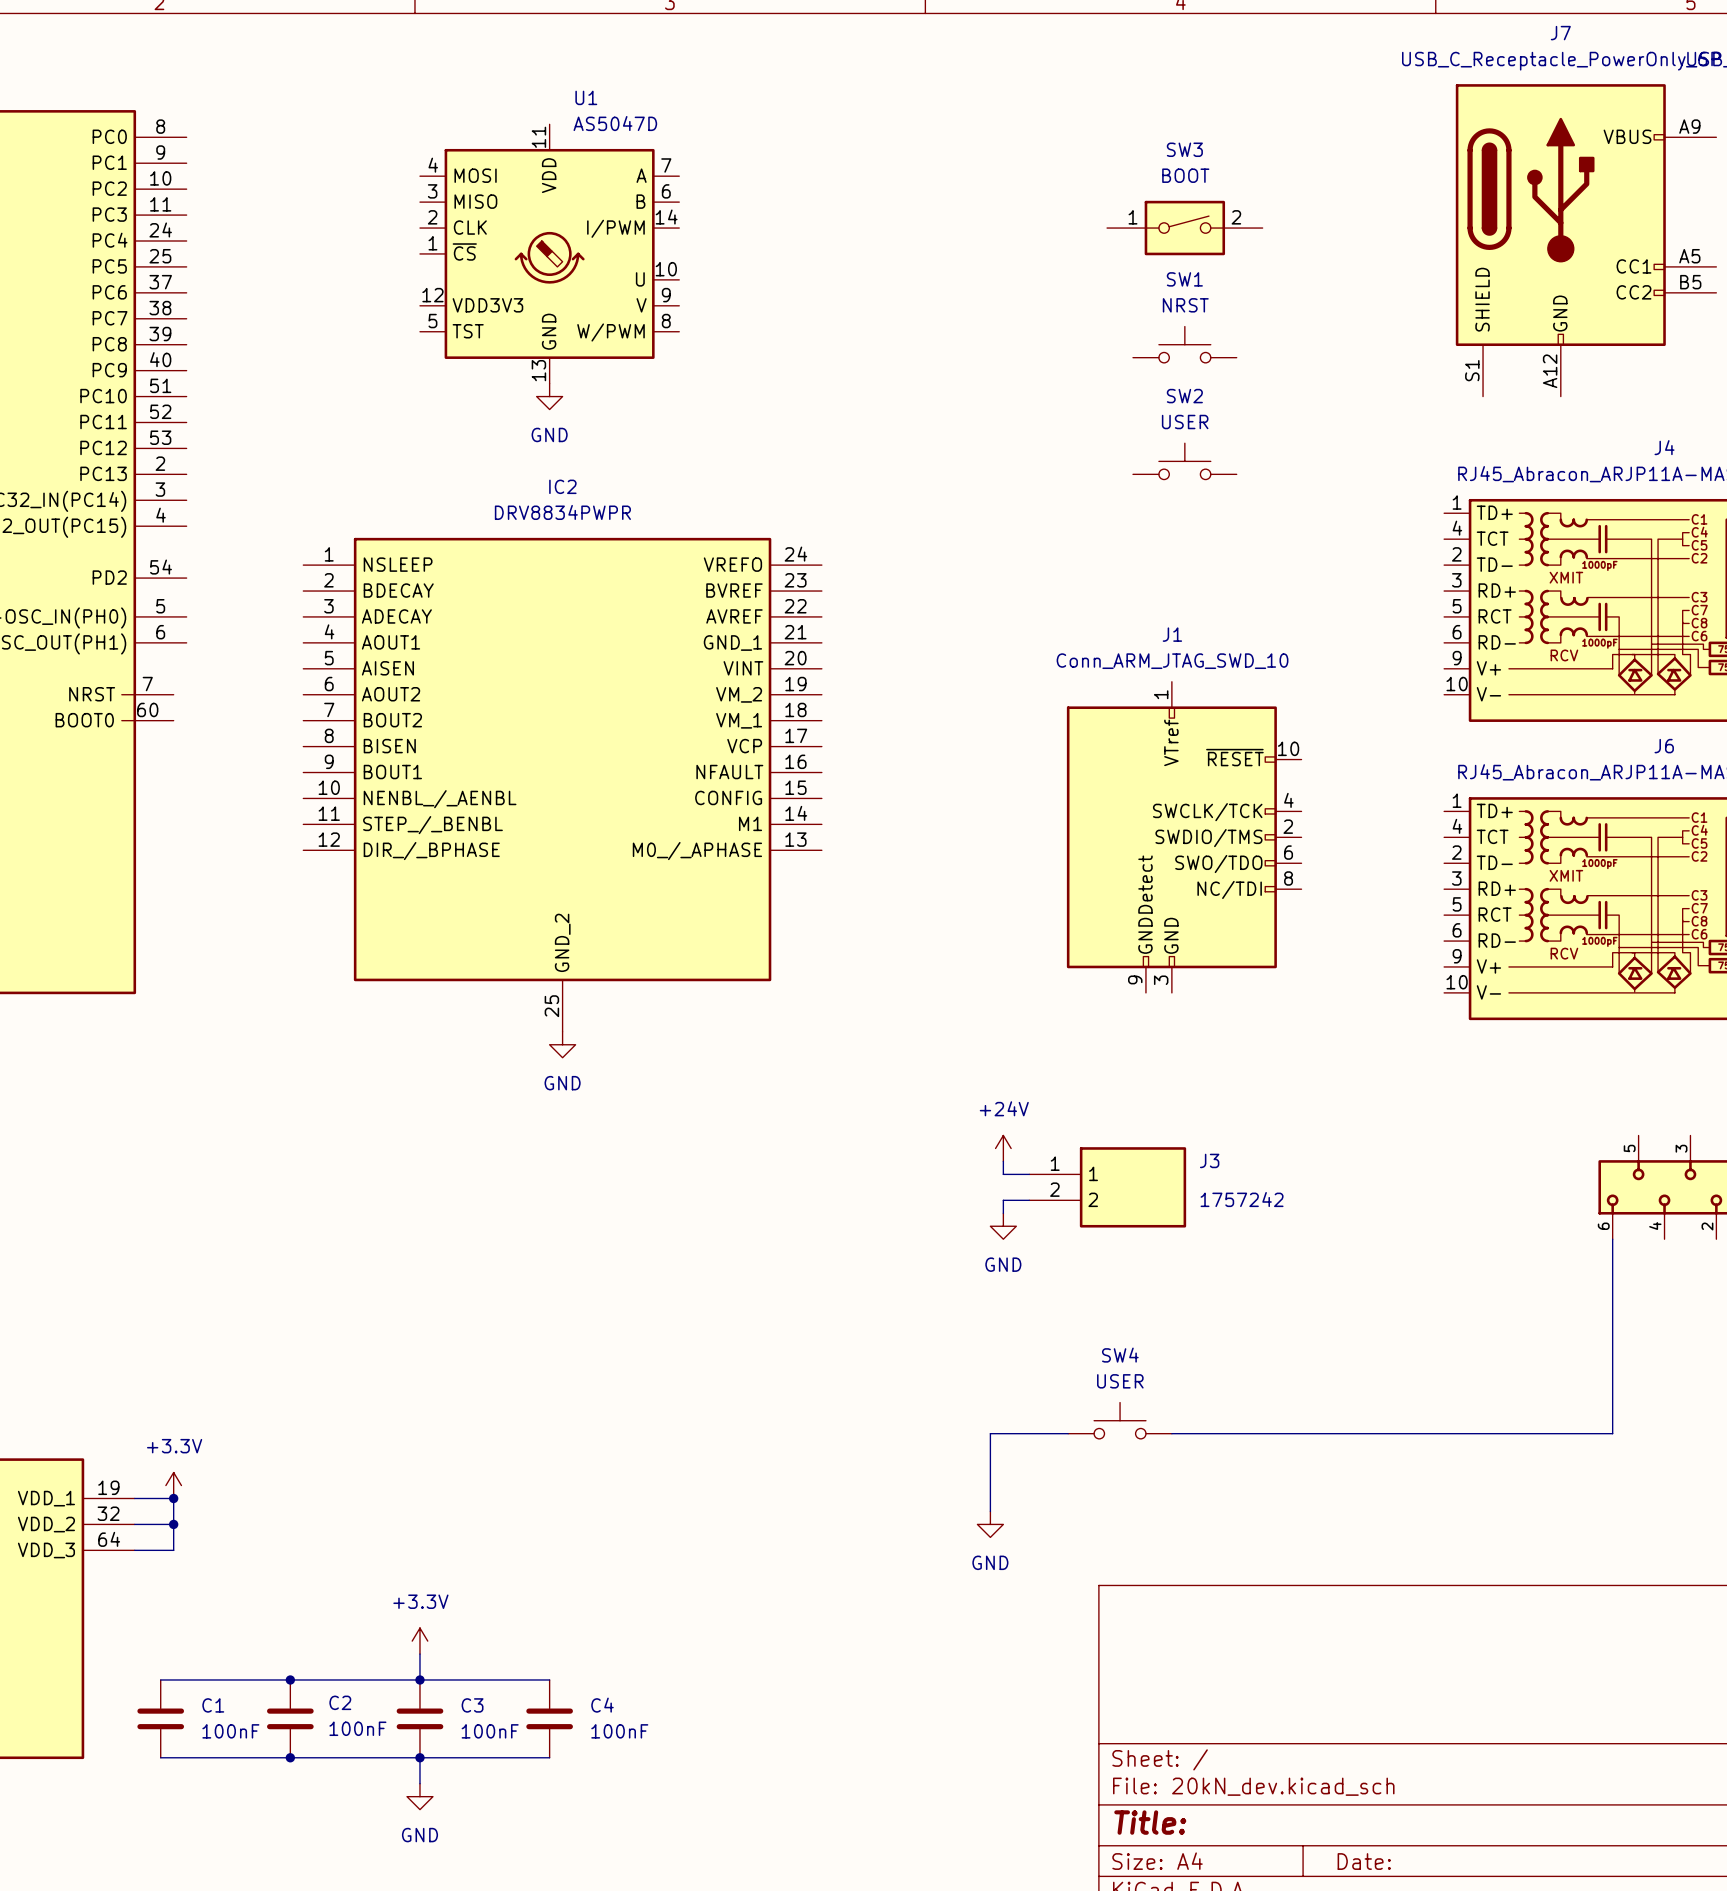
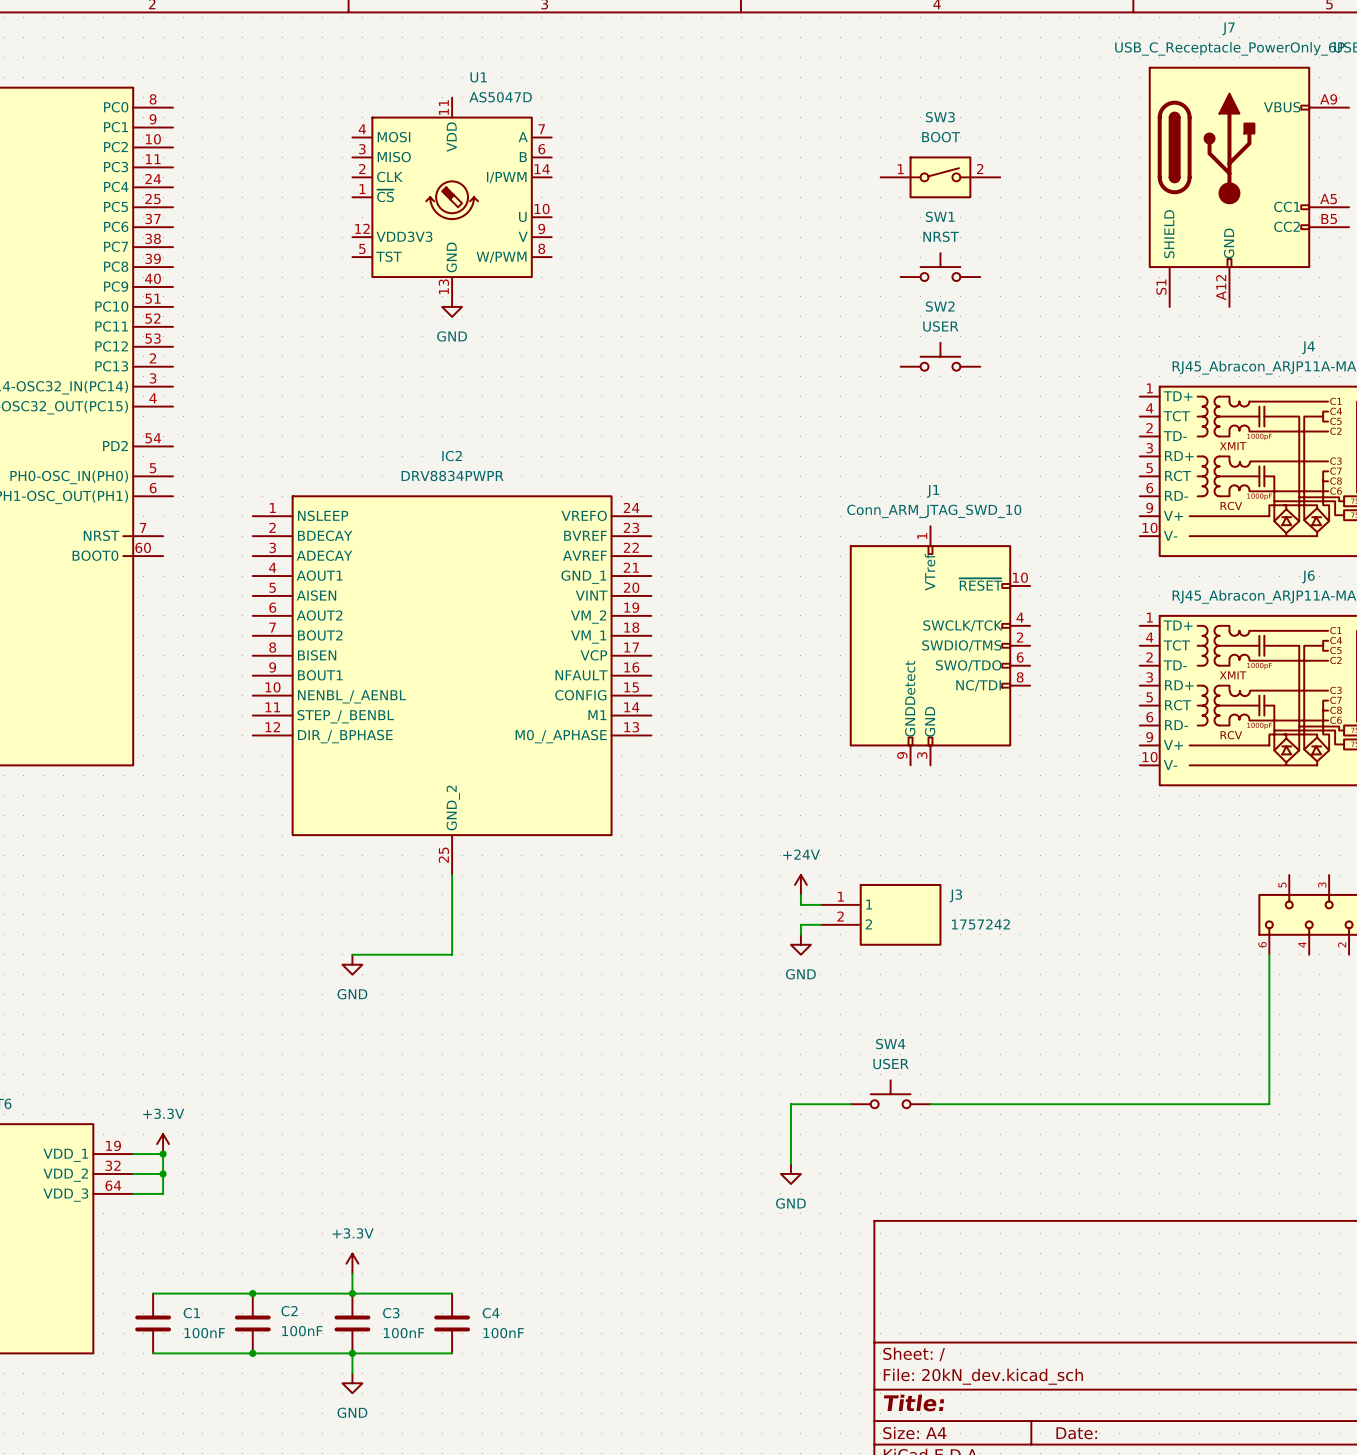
IC2 position: (562, 784) -> (452, 685)
power symbol position: GND (562, 1044) -> GND (352, 964)
wire: none -> (452, 875) (452, 954) (352, 954)

